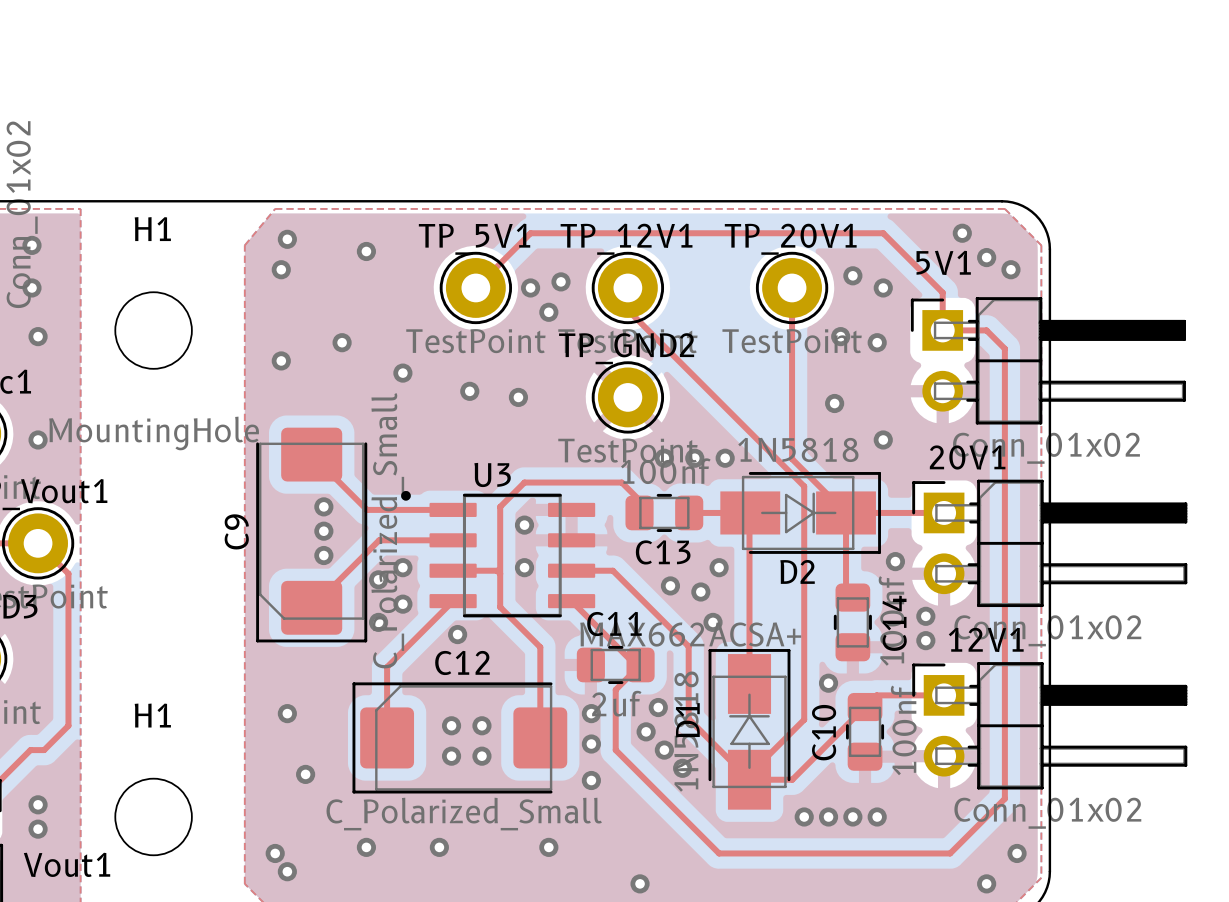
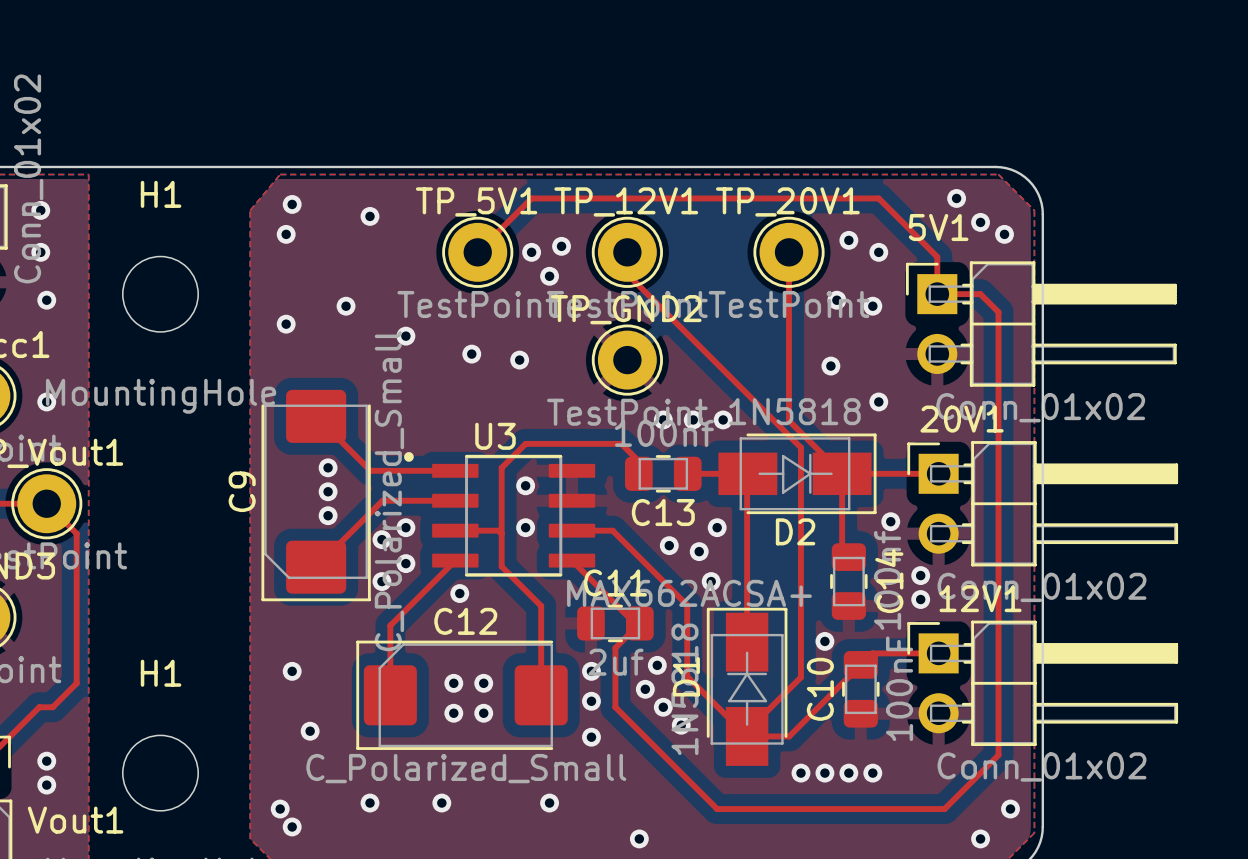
C10 value: 100nf (903, 730) -> 100nF (899, 688)

